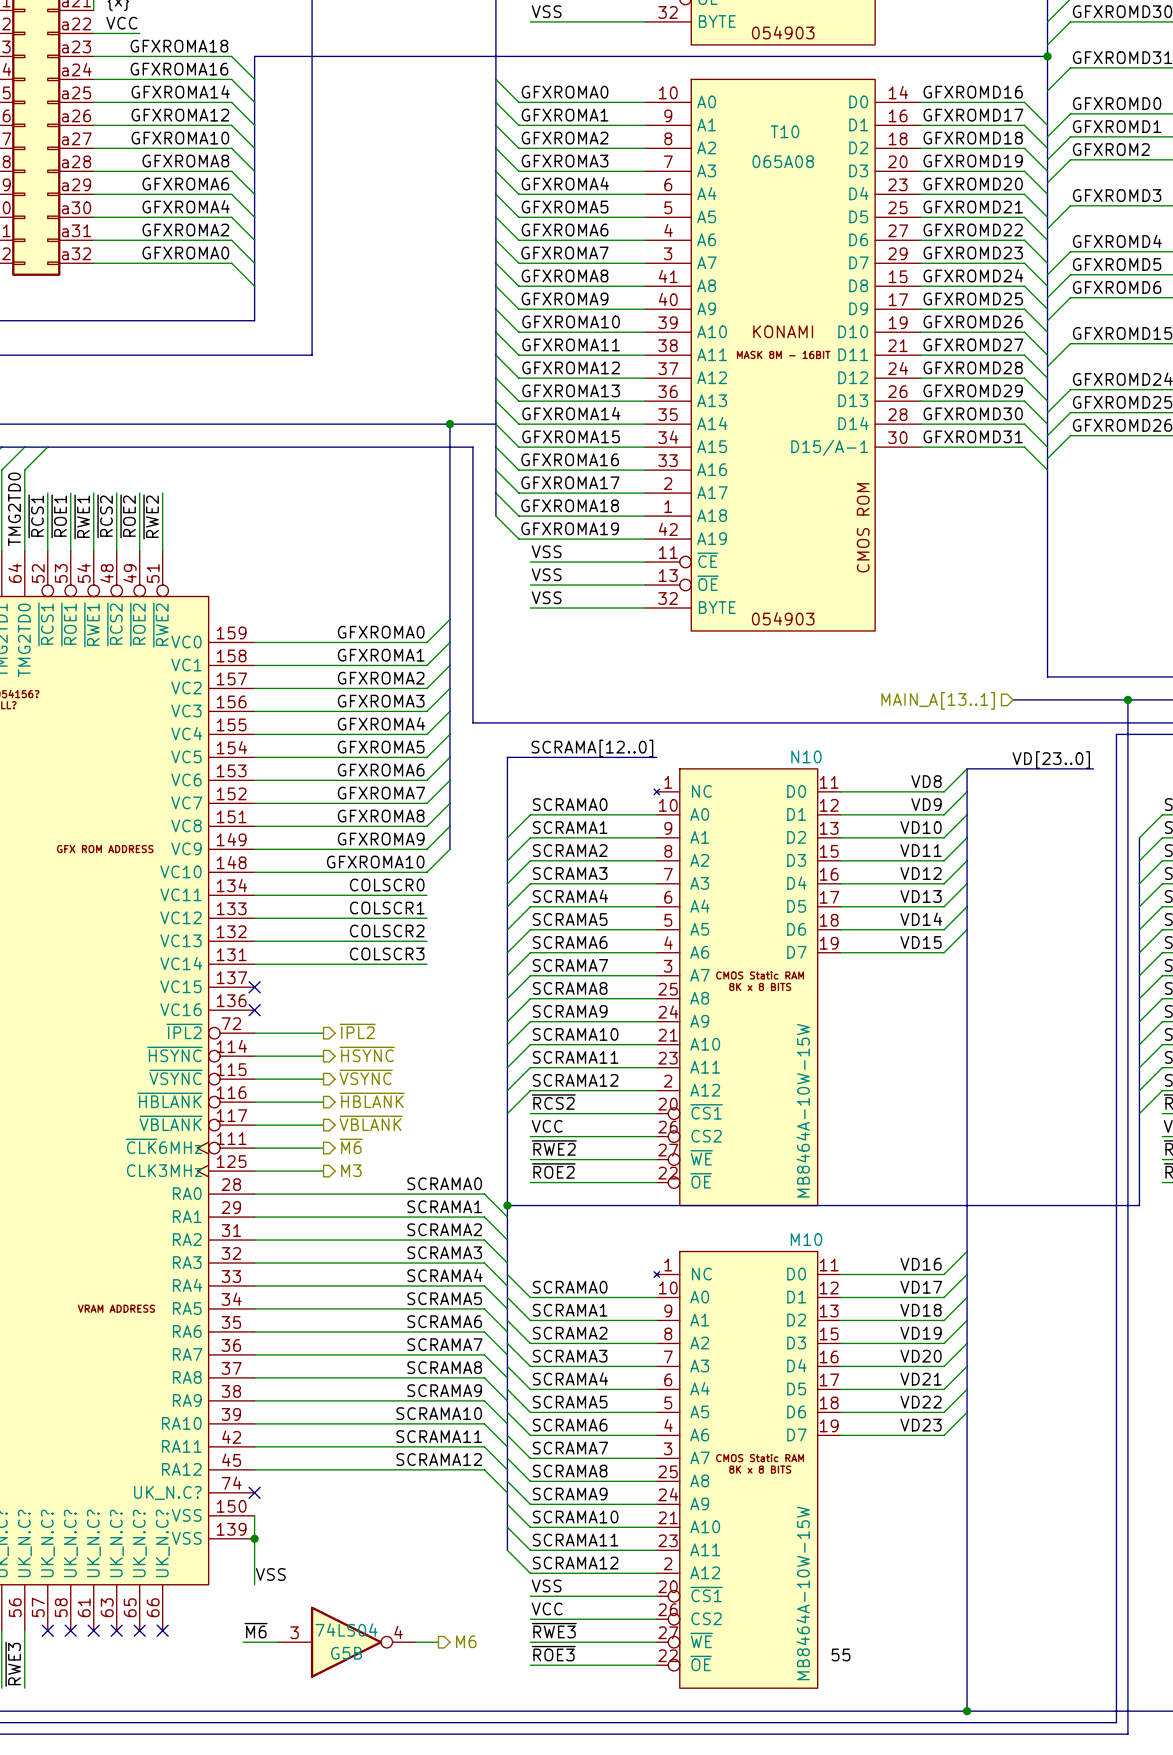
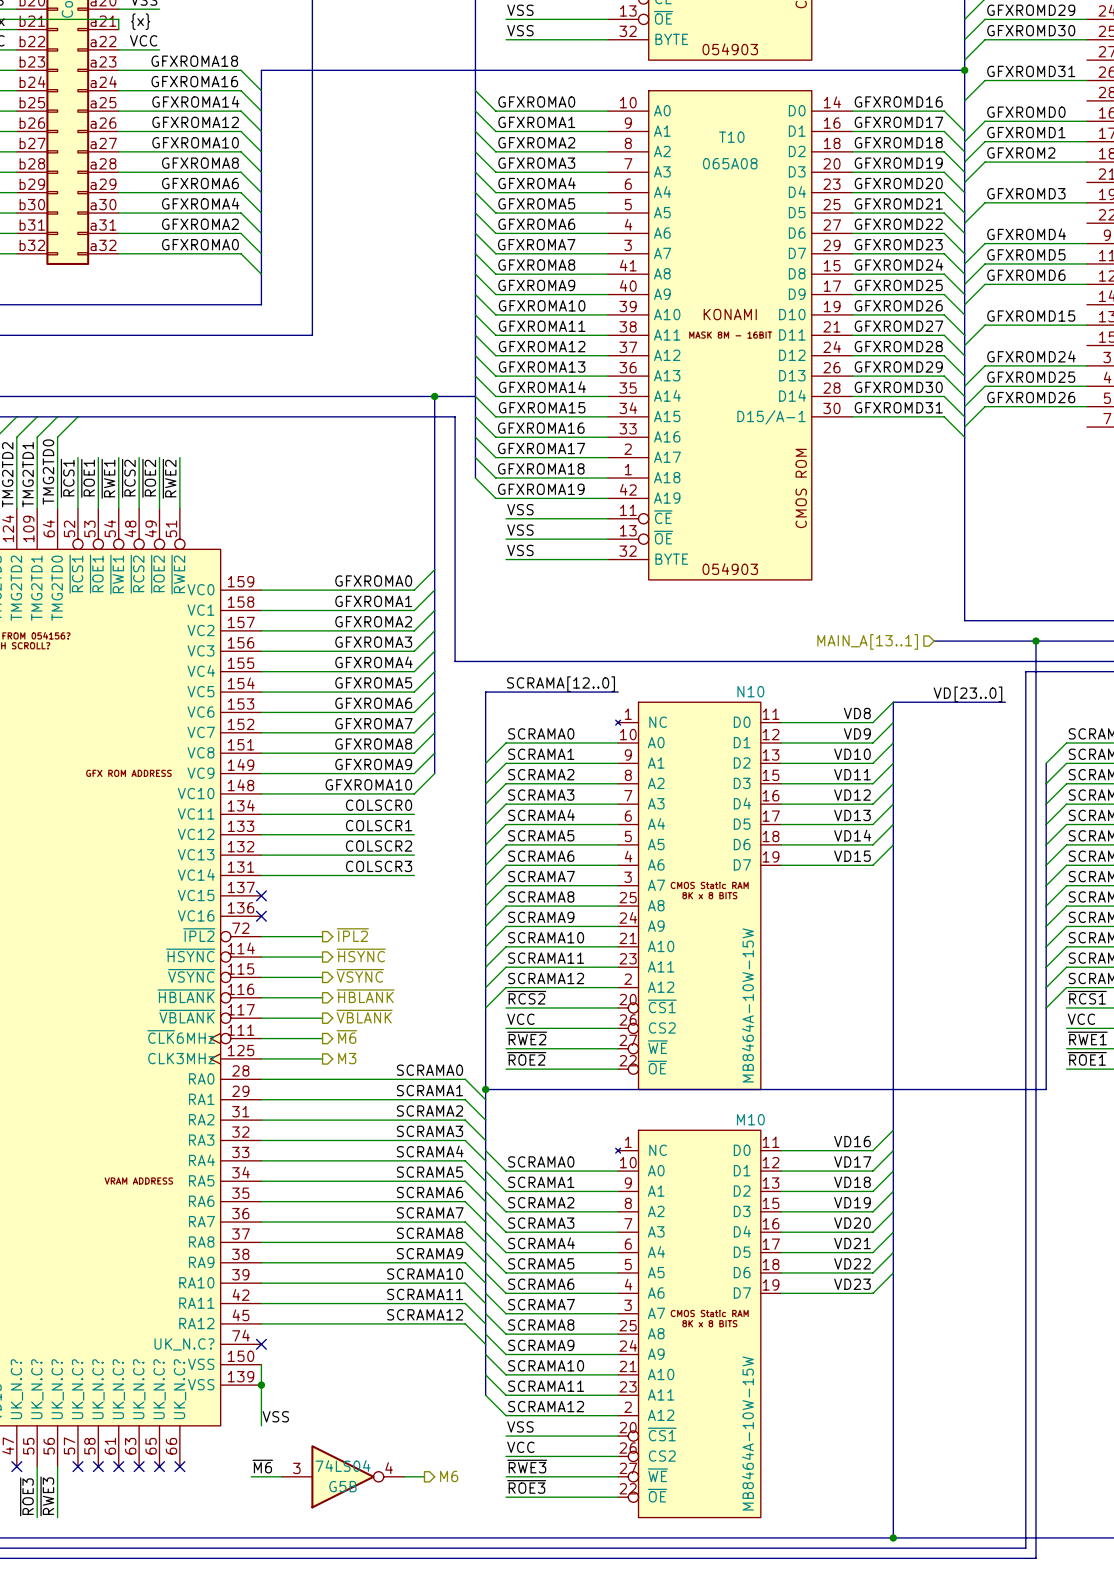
label: 55 (841, 1654) -> none

